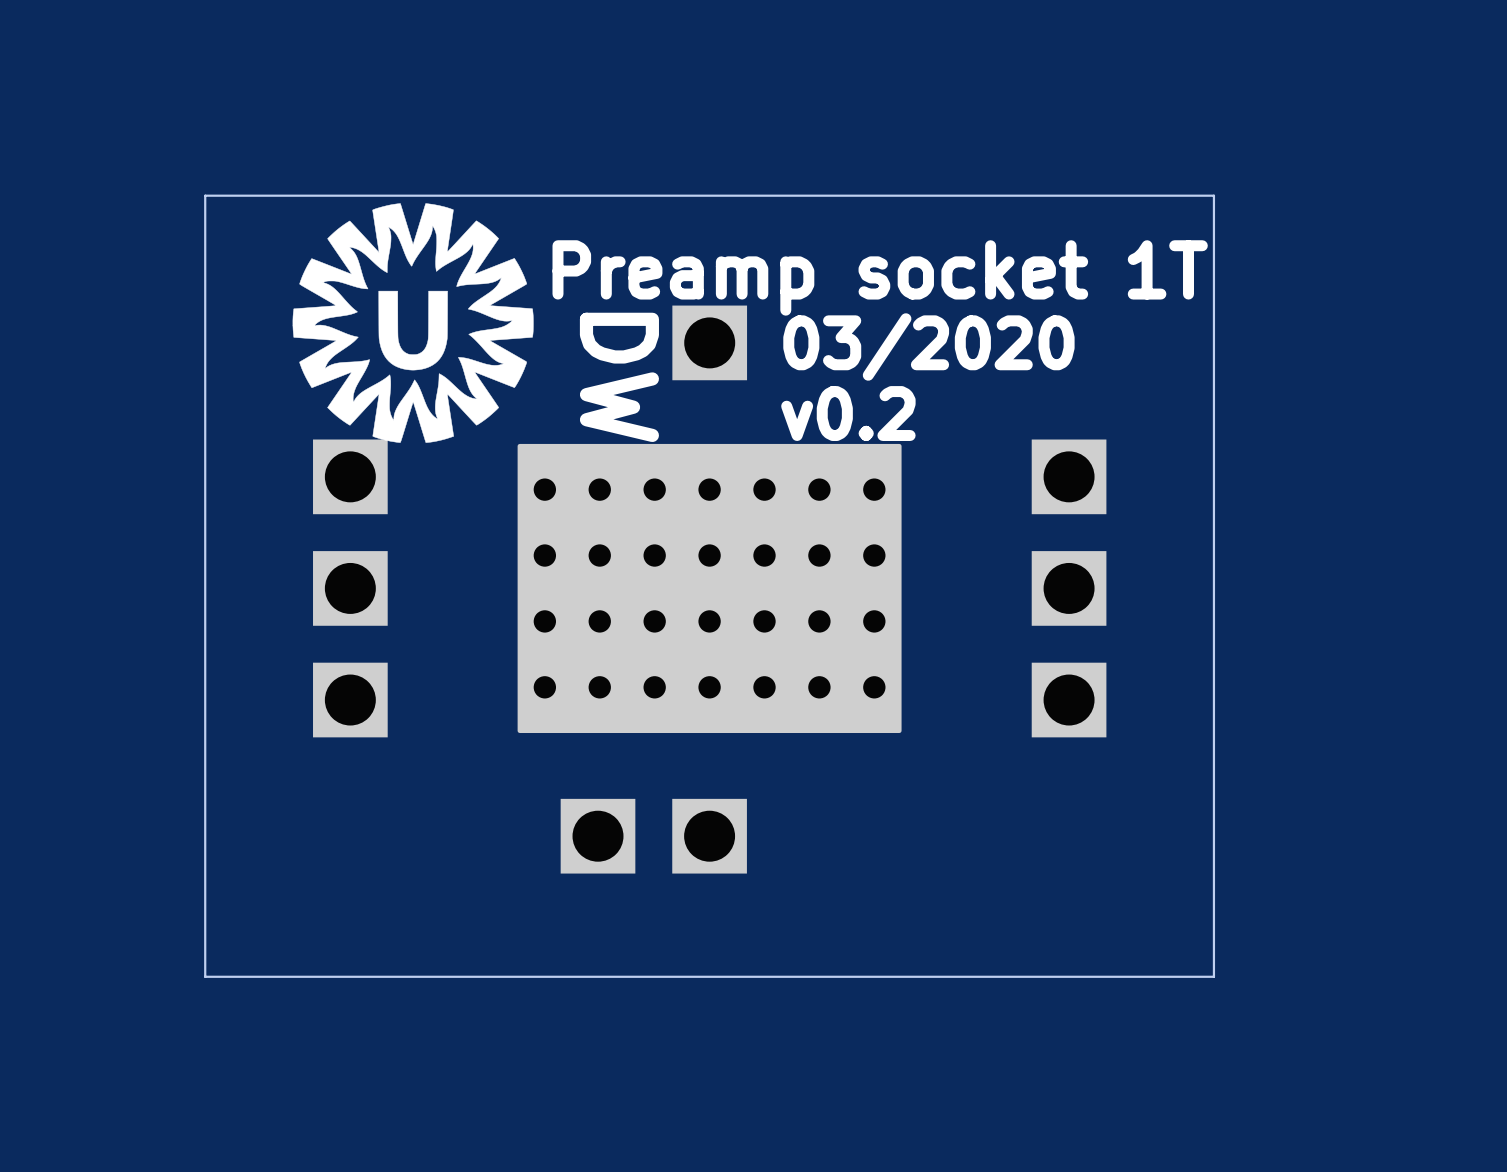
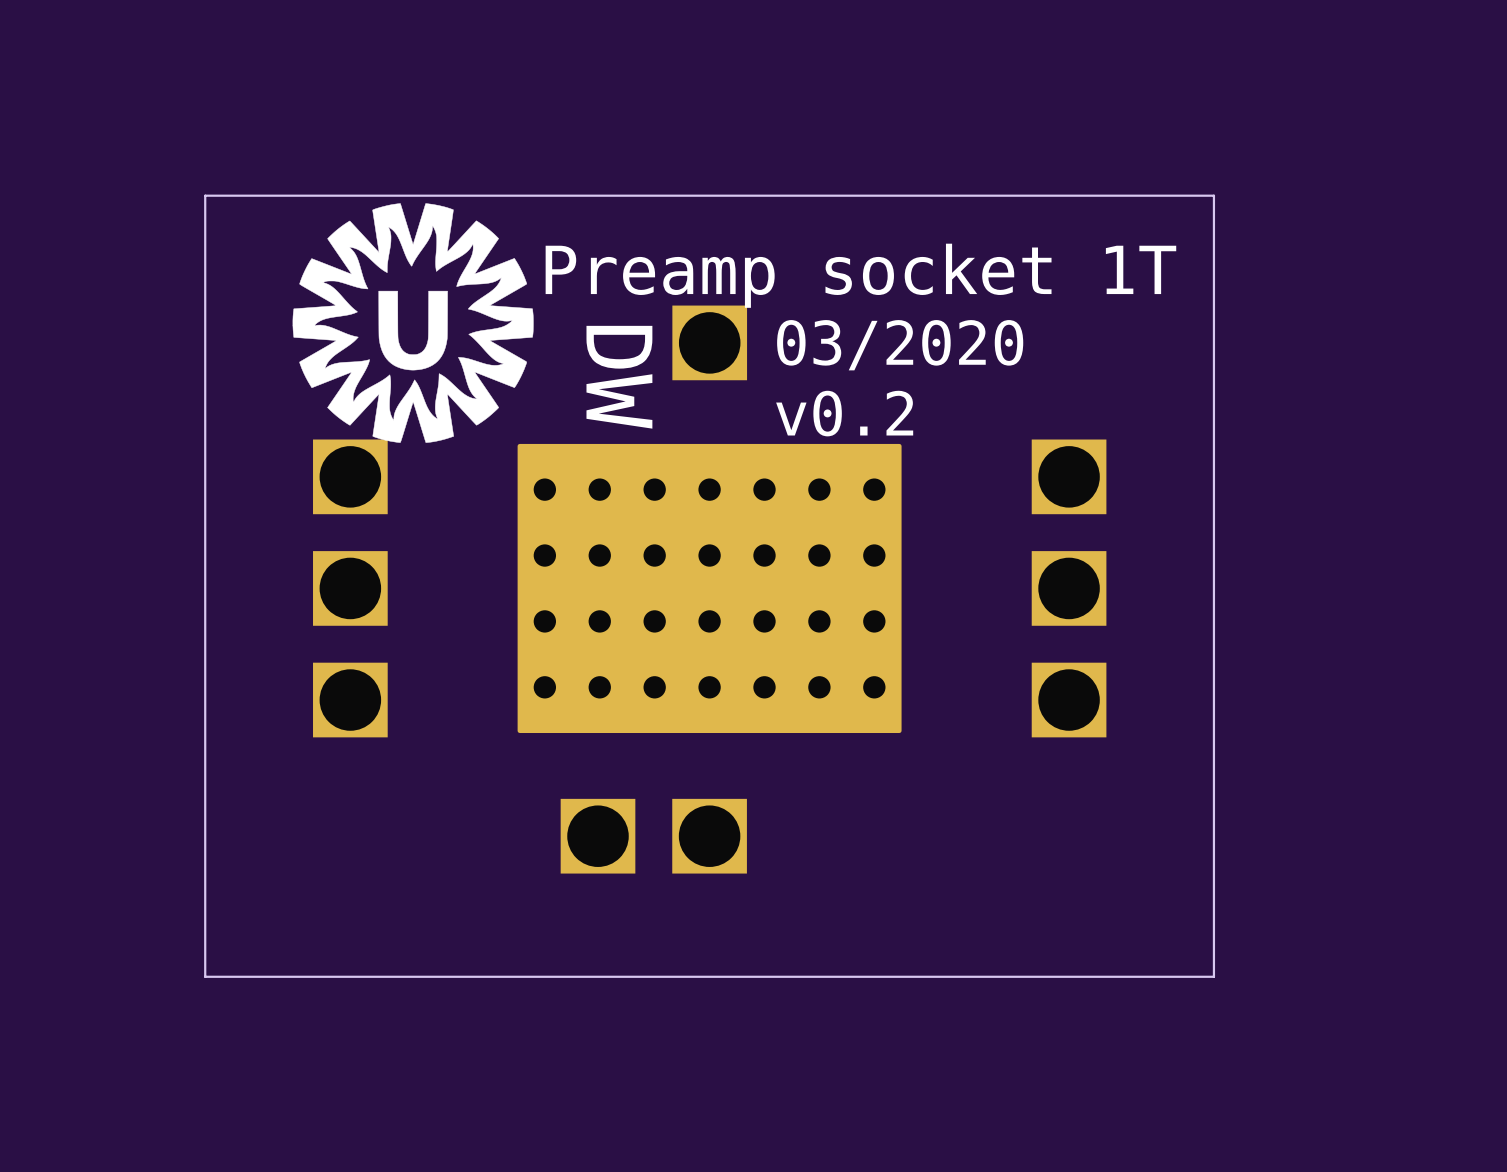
part footprint: [672, 305, 748, 381] -> [672, 305, 748, 381]
part footprint: [313, 439, 388, 738] -> [313, 439, 388, 738]
part footprint: [1031, 439, 1107, 738] -> [1031, 439, 1107, 738]
part footprint: [560, 798, 747, 874] -> [560, 798, 747, 874]

